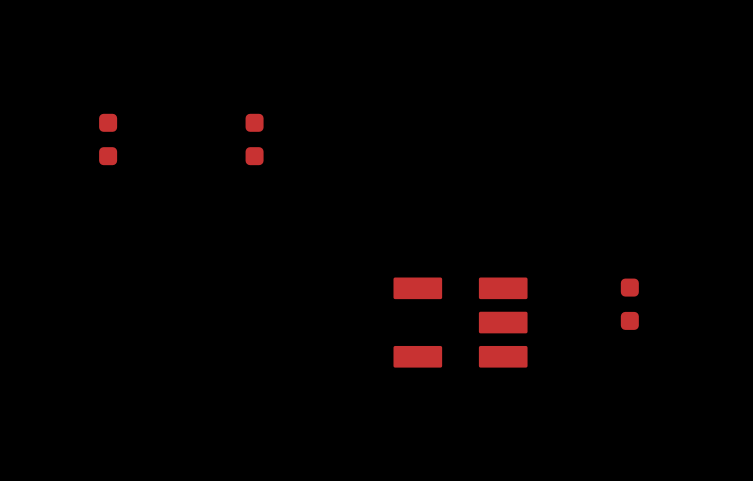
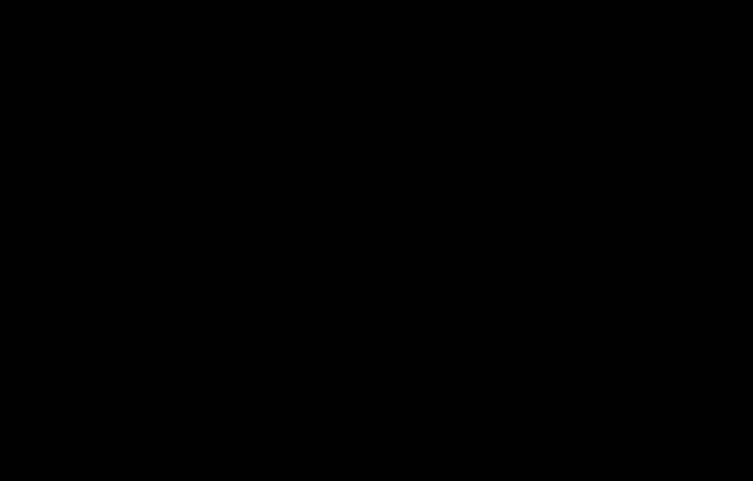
part: (108, 139) -> none
part: (254, 139) -> none
part: (629, 304) -> none
part: (460, 322) -> none

